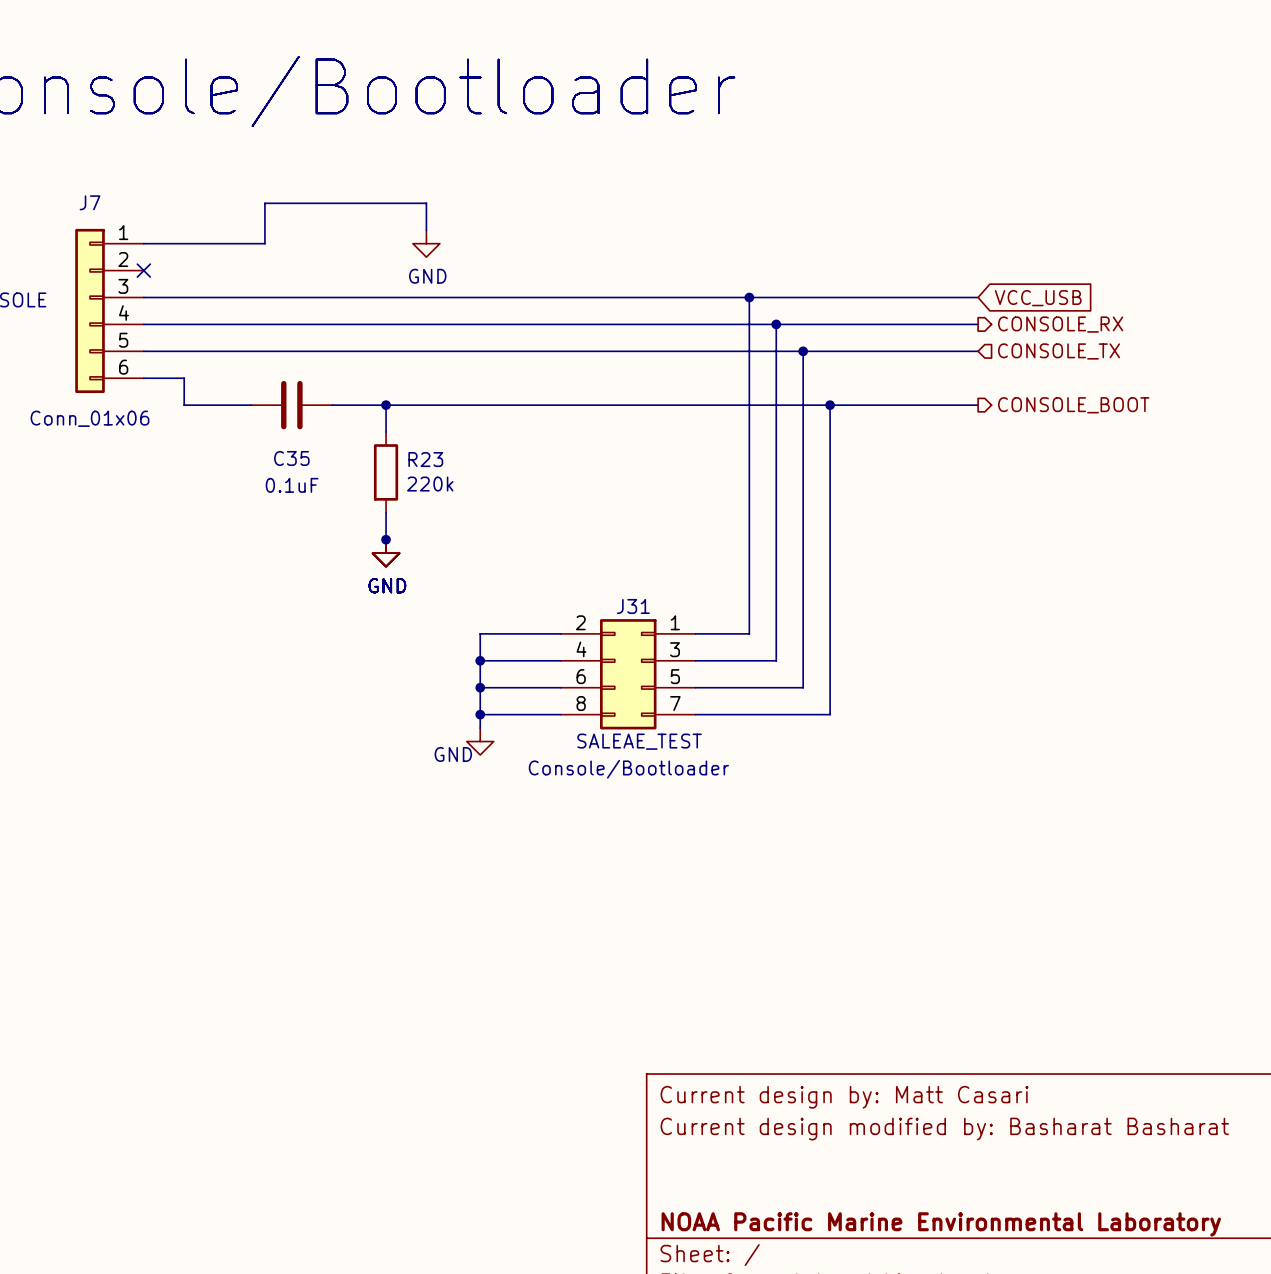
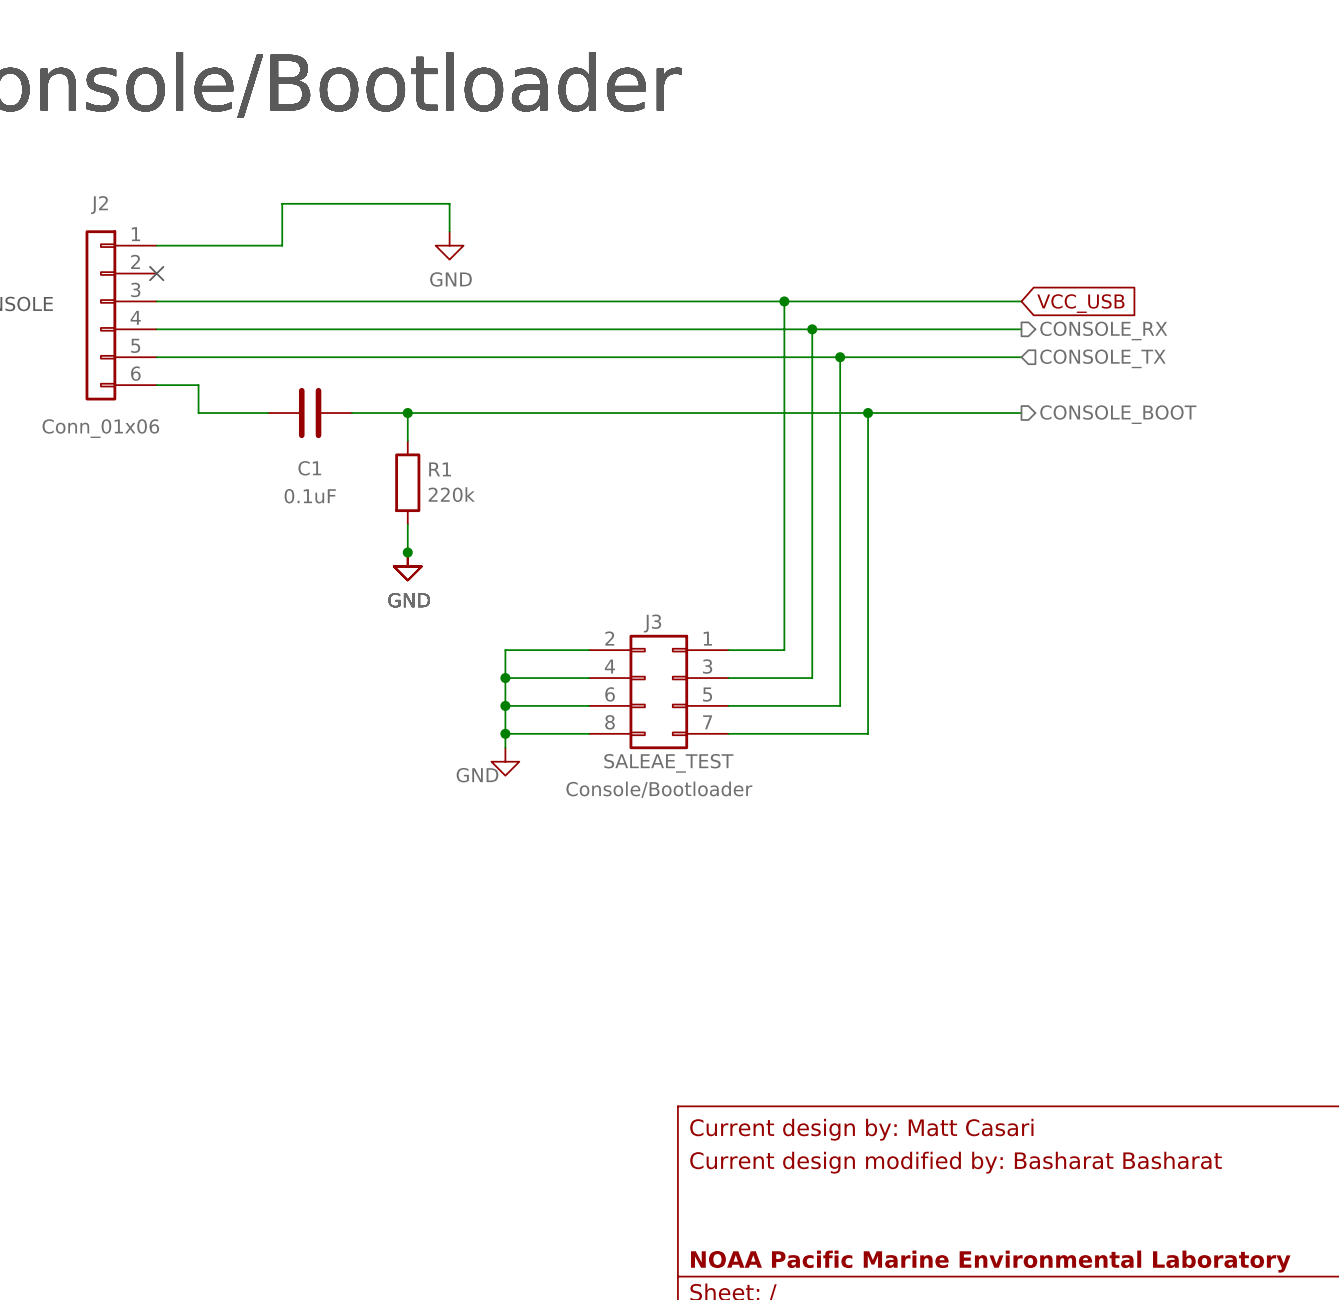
J7 name: J7 (90, 202) -> J2 (99, 205)
C35 name: C35 (291, 458) -> C1 (309, 468)
R23 name: R23 (425, 459) -> R1 (440, 469)
J31 name: J31 (633, 606) -> J3 (652, 623)

